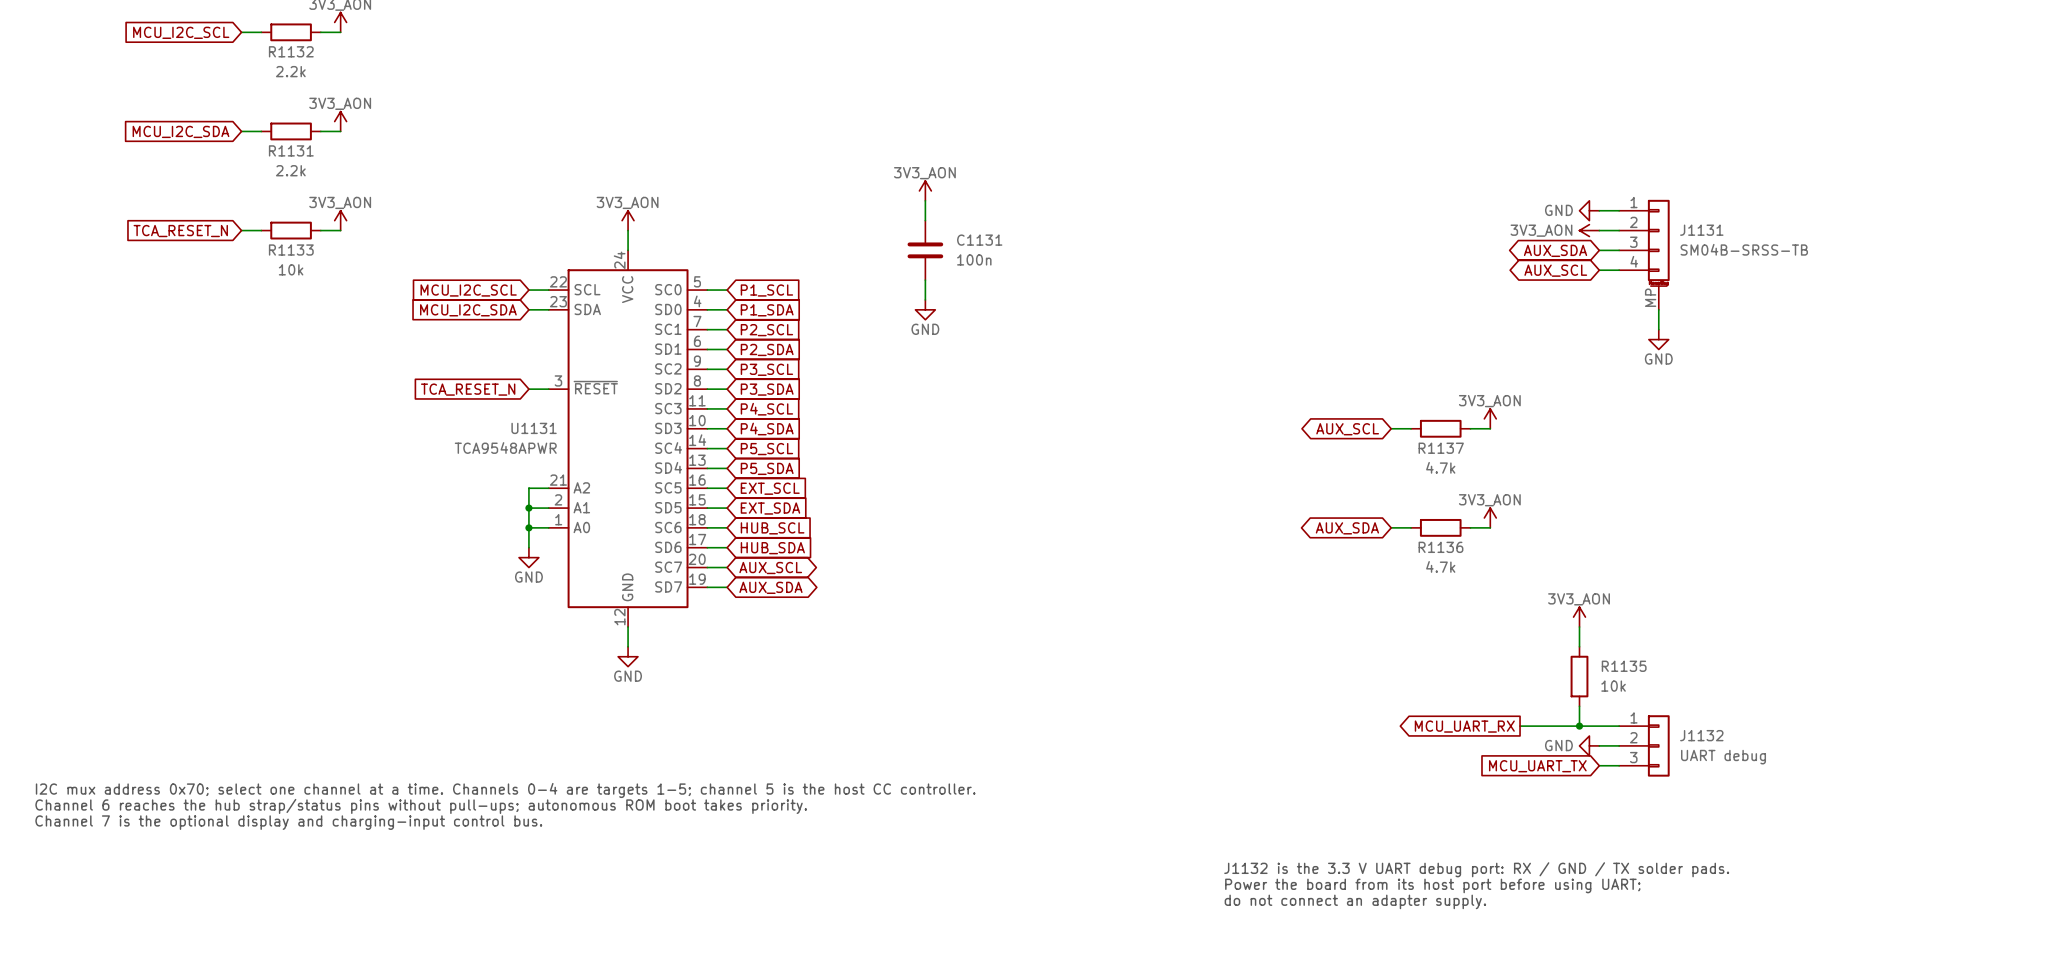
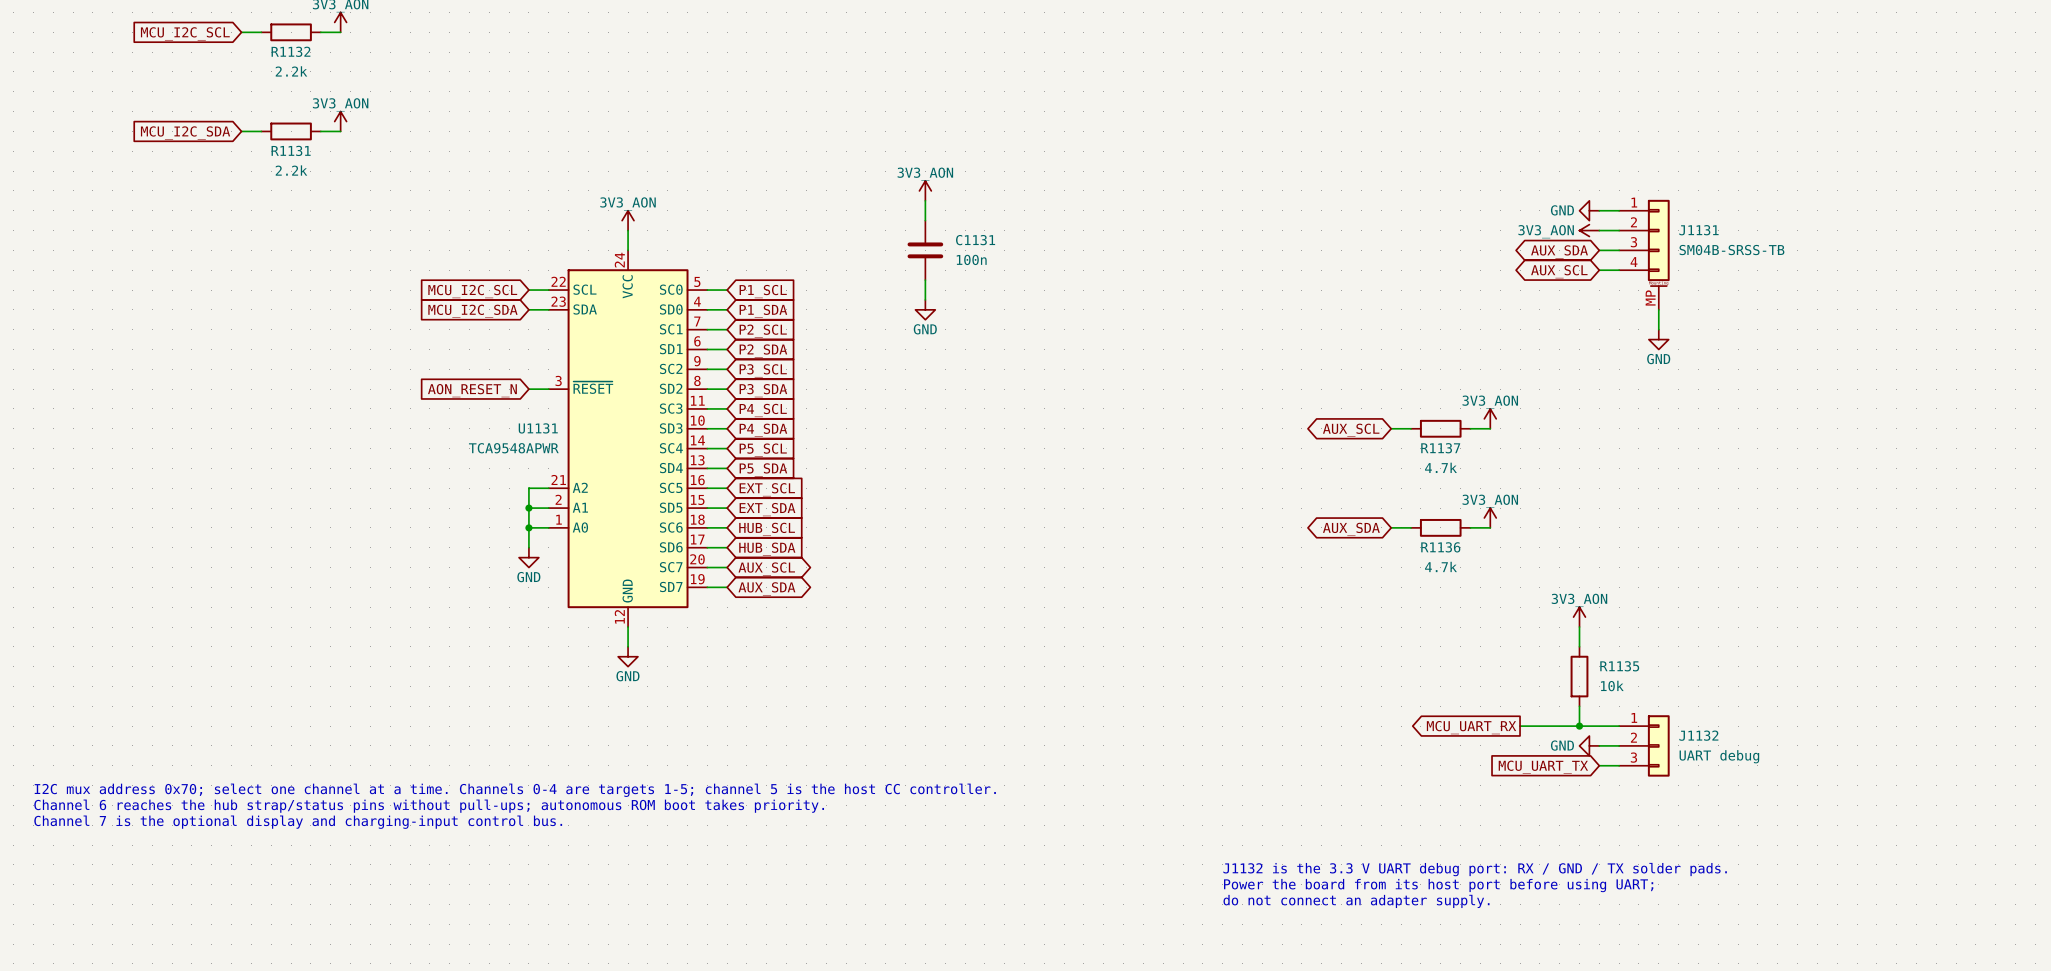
power symbol: 3V3_AON (340, 220) -> none
wire: (241, 230) (261, 230) -> none
R1133: 10k (291, 230) -> none
wire: (320, 230) (340, 230) -> none
global label: TCA_RESET_N (180, 231) -> none
global label: TCA_RESET_N (468, 389) -> AON_RESET_N (472, 390)

